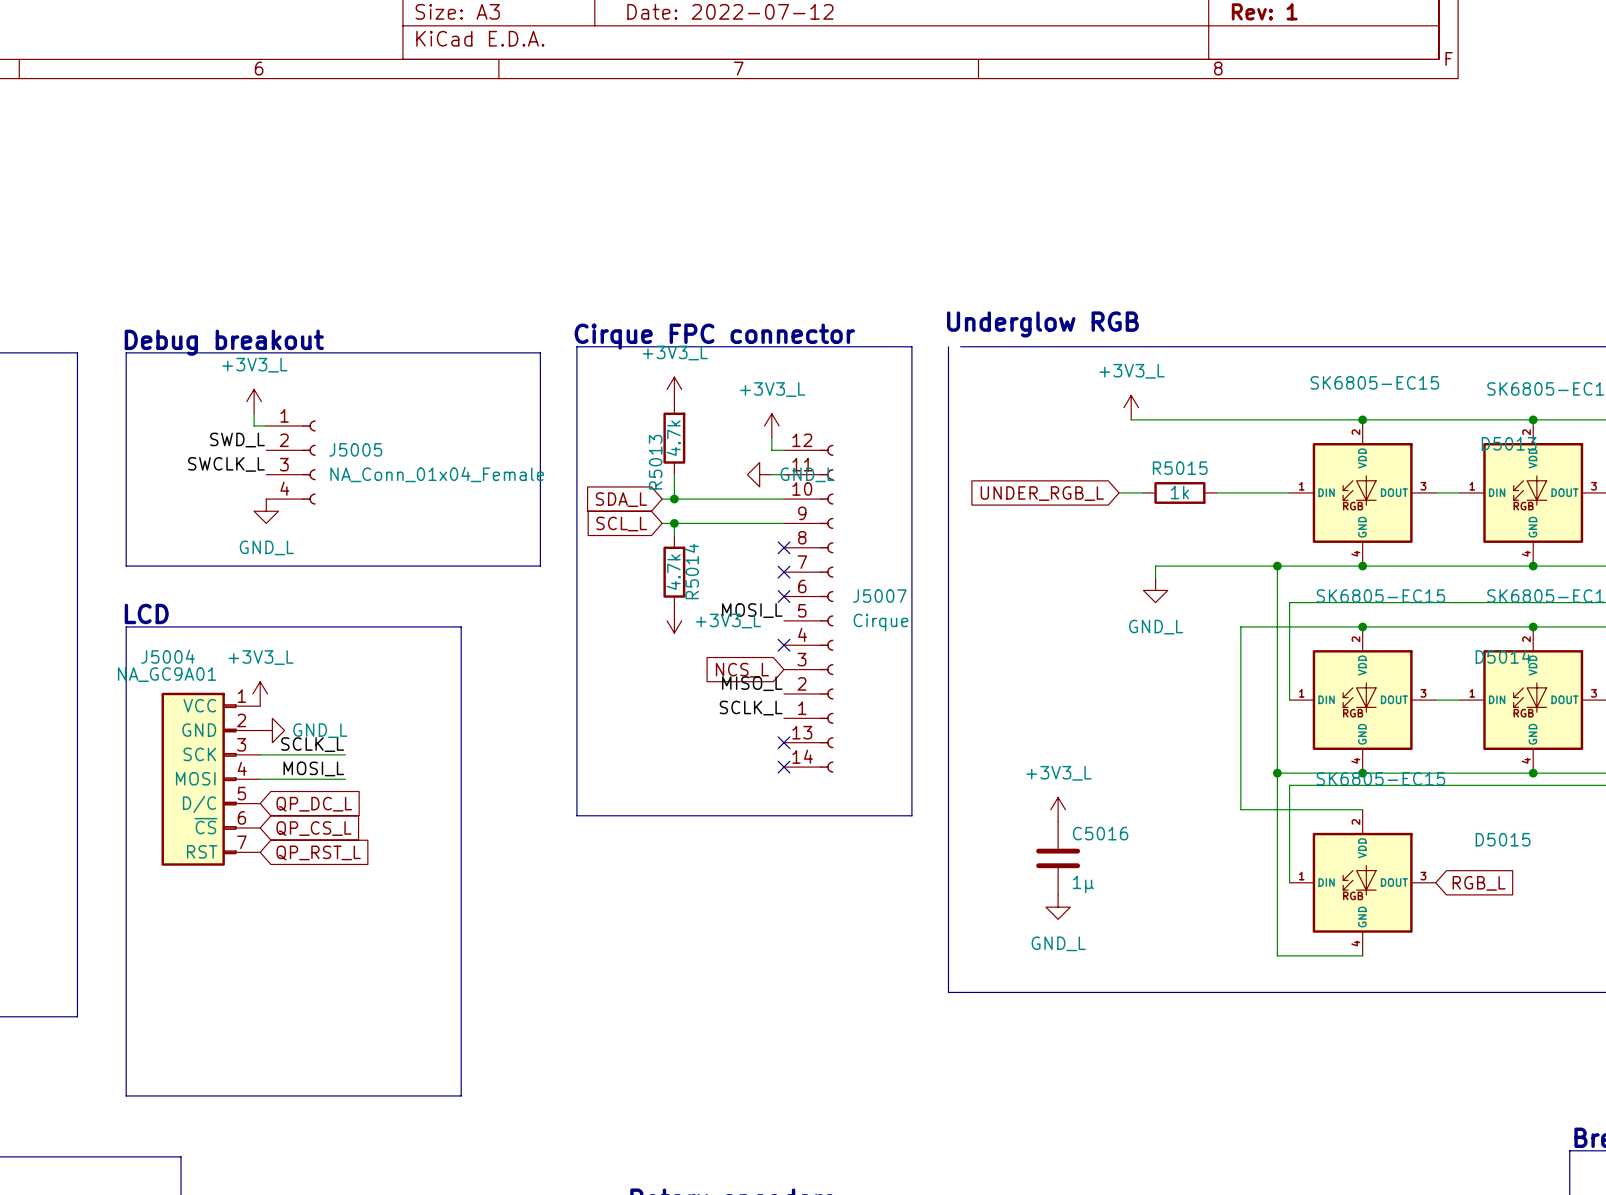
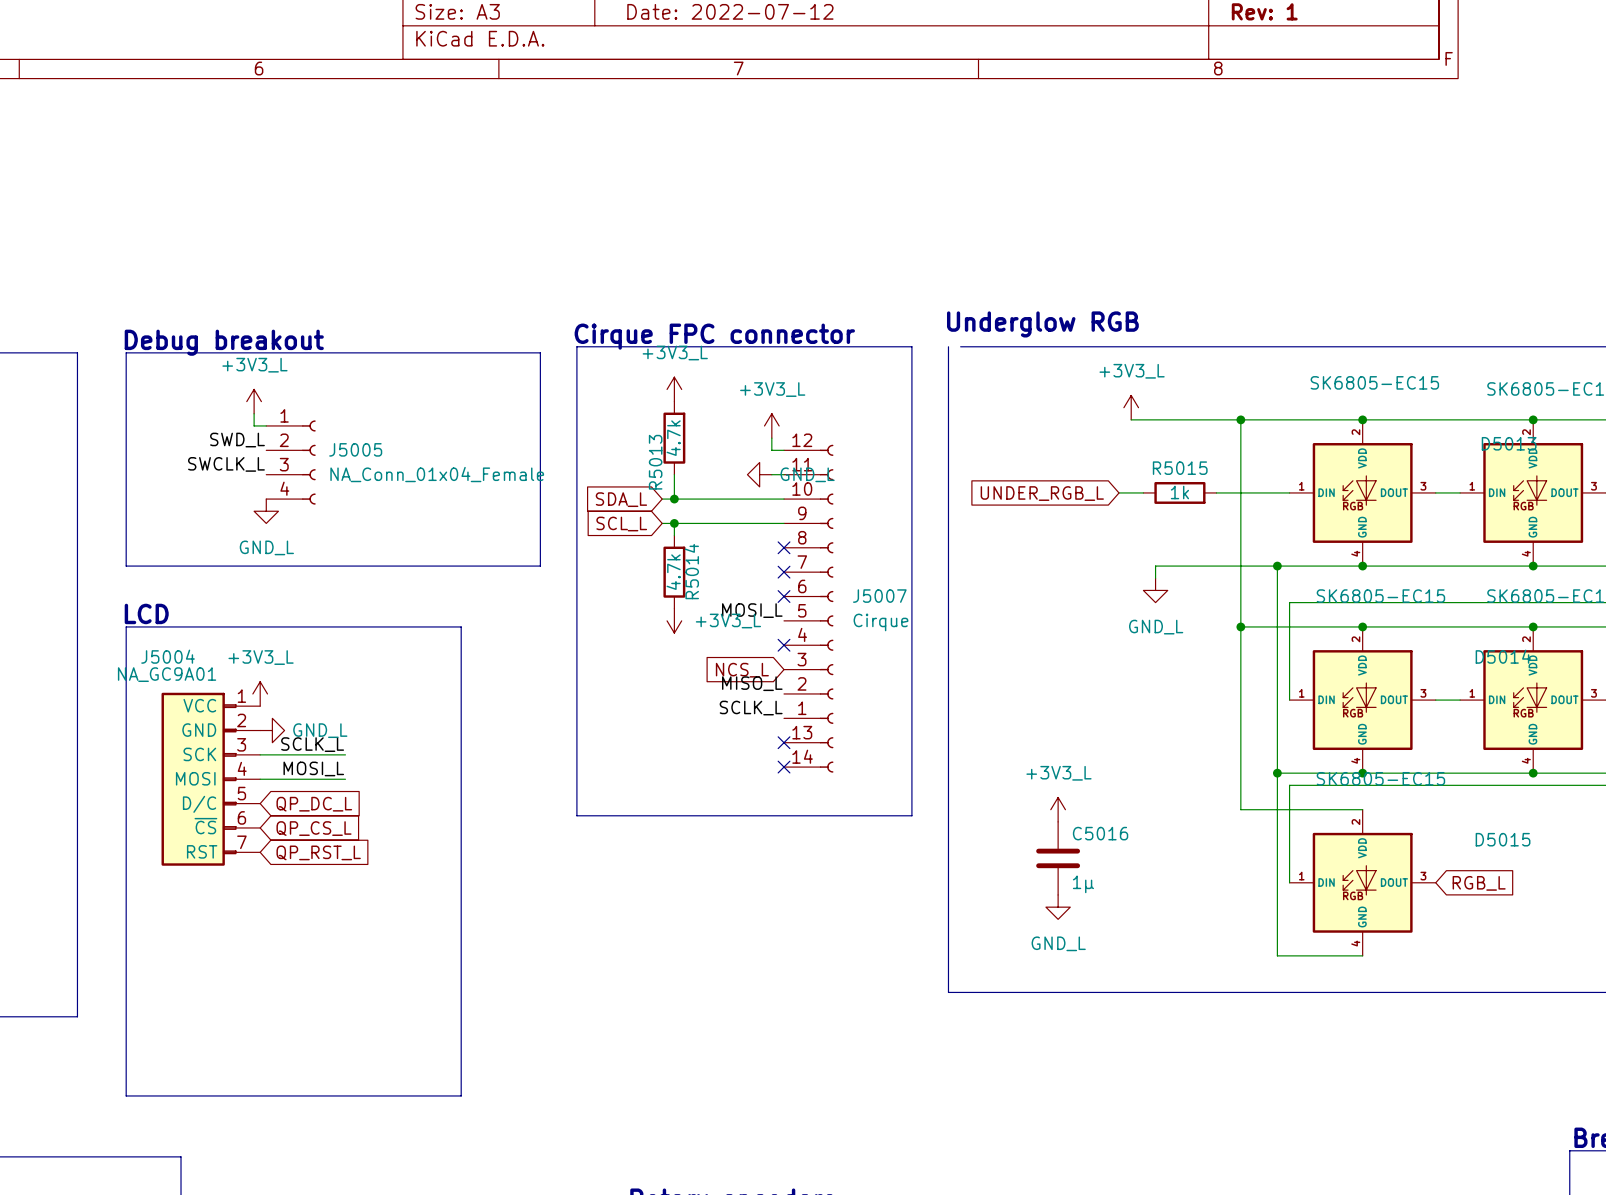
wire: none -> (1240, 419) (1240, 626)
junction: none -> (1240, 419)
junction: none -> (1240, 626)

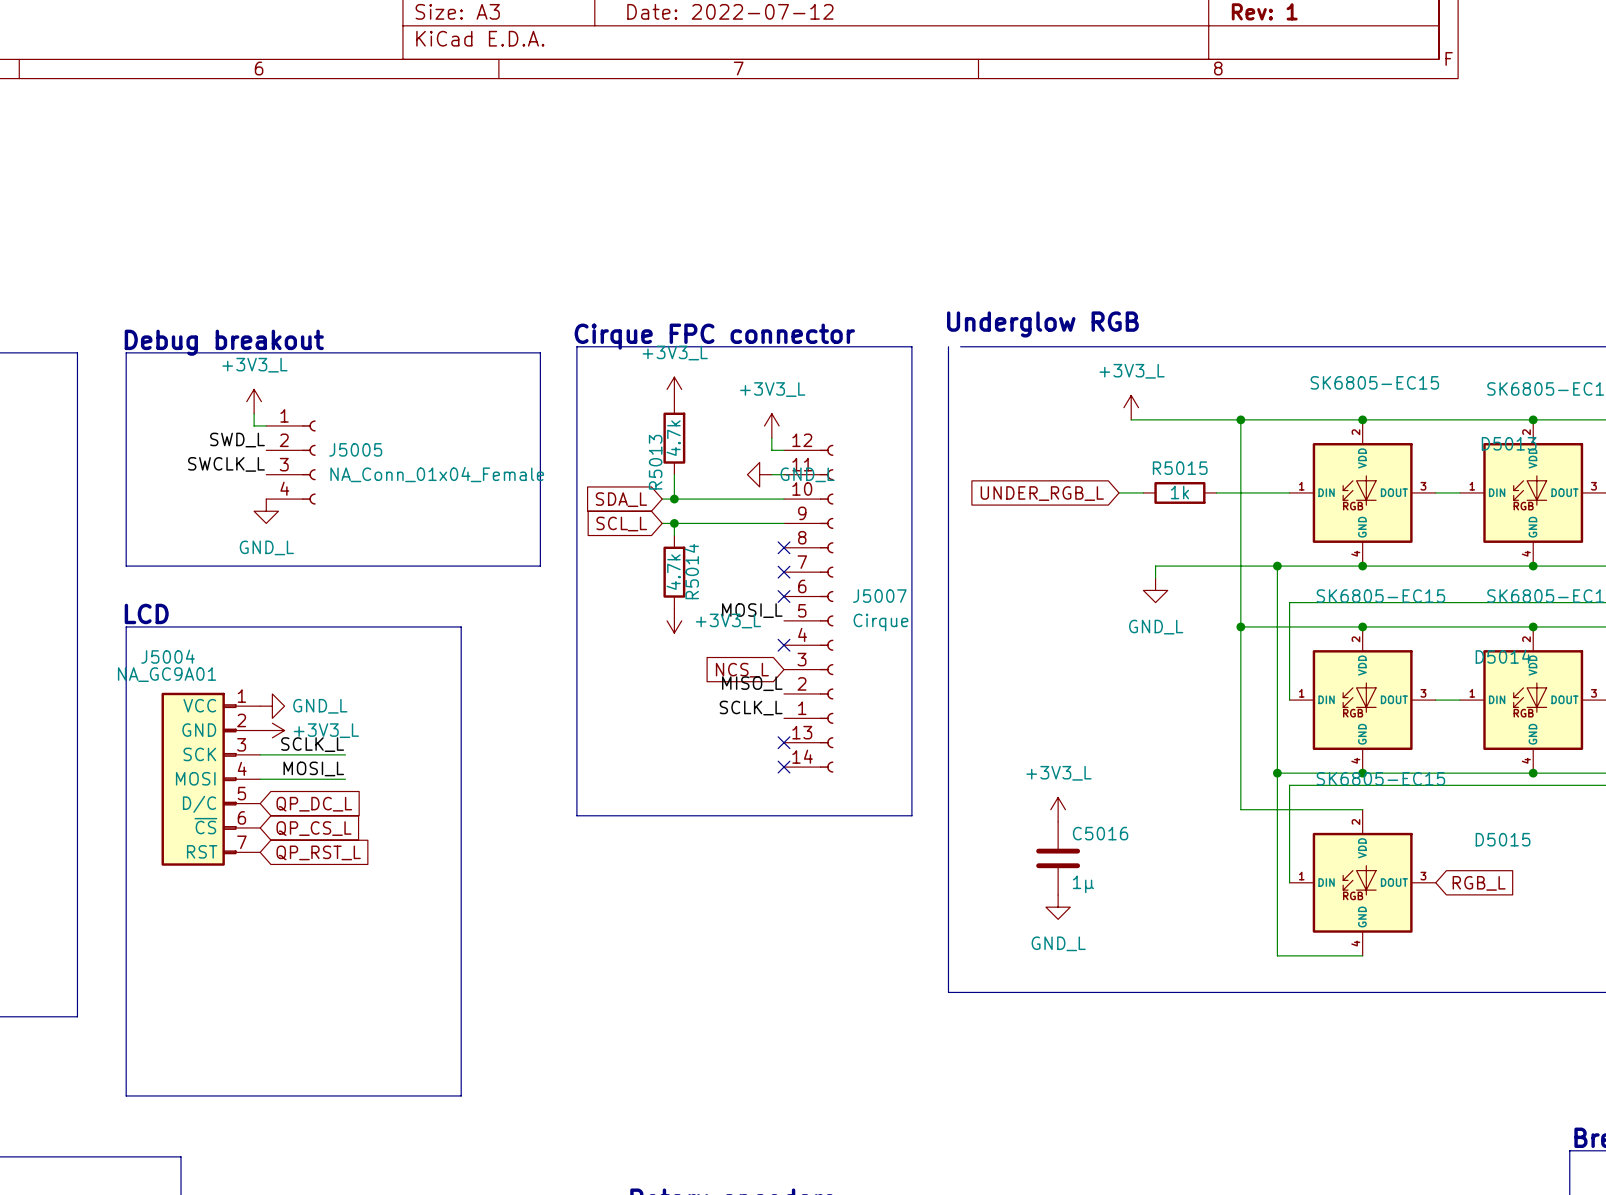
power symbol: +3V3_L (260, 693) -> none
power symbol: none -> GND_L (272, 706)
power symbol: GND_L (272, 730) -> +3V3_L (272, 730)

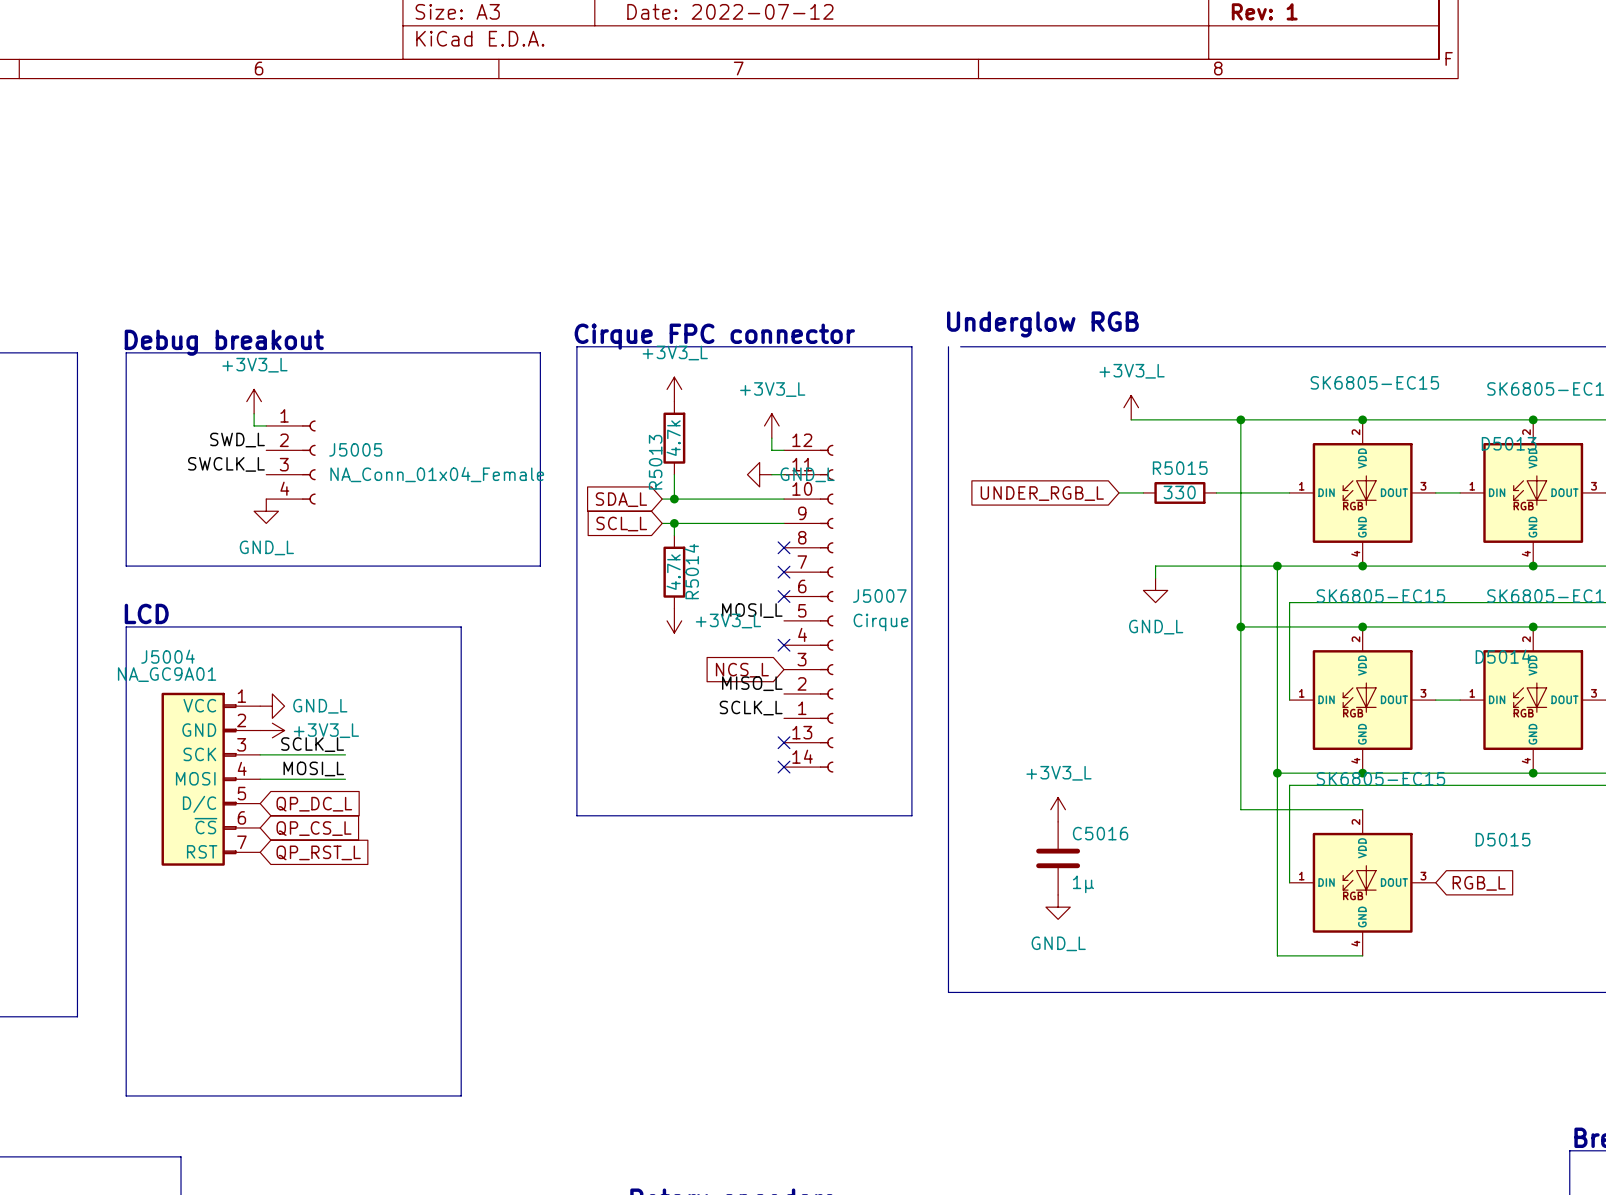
R5015 value: 1k (1179, 492) -> 330 (1179, 492)

